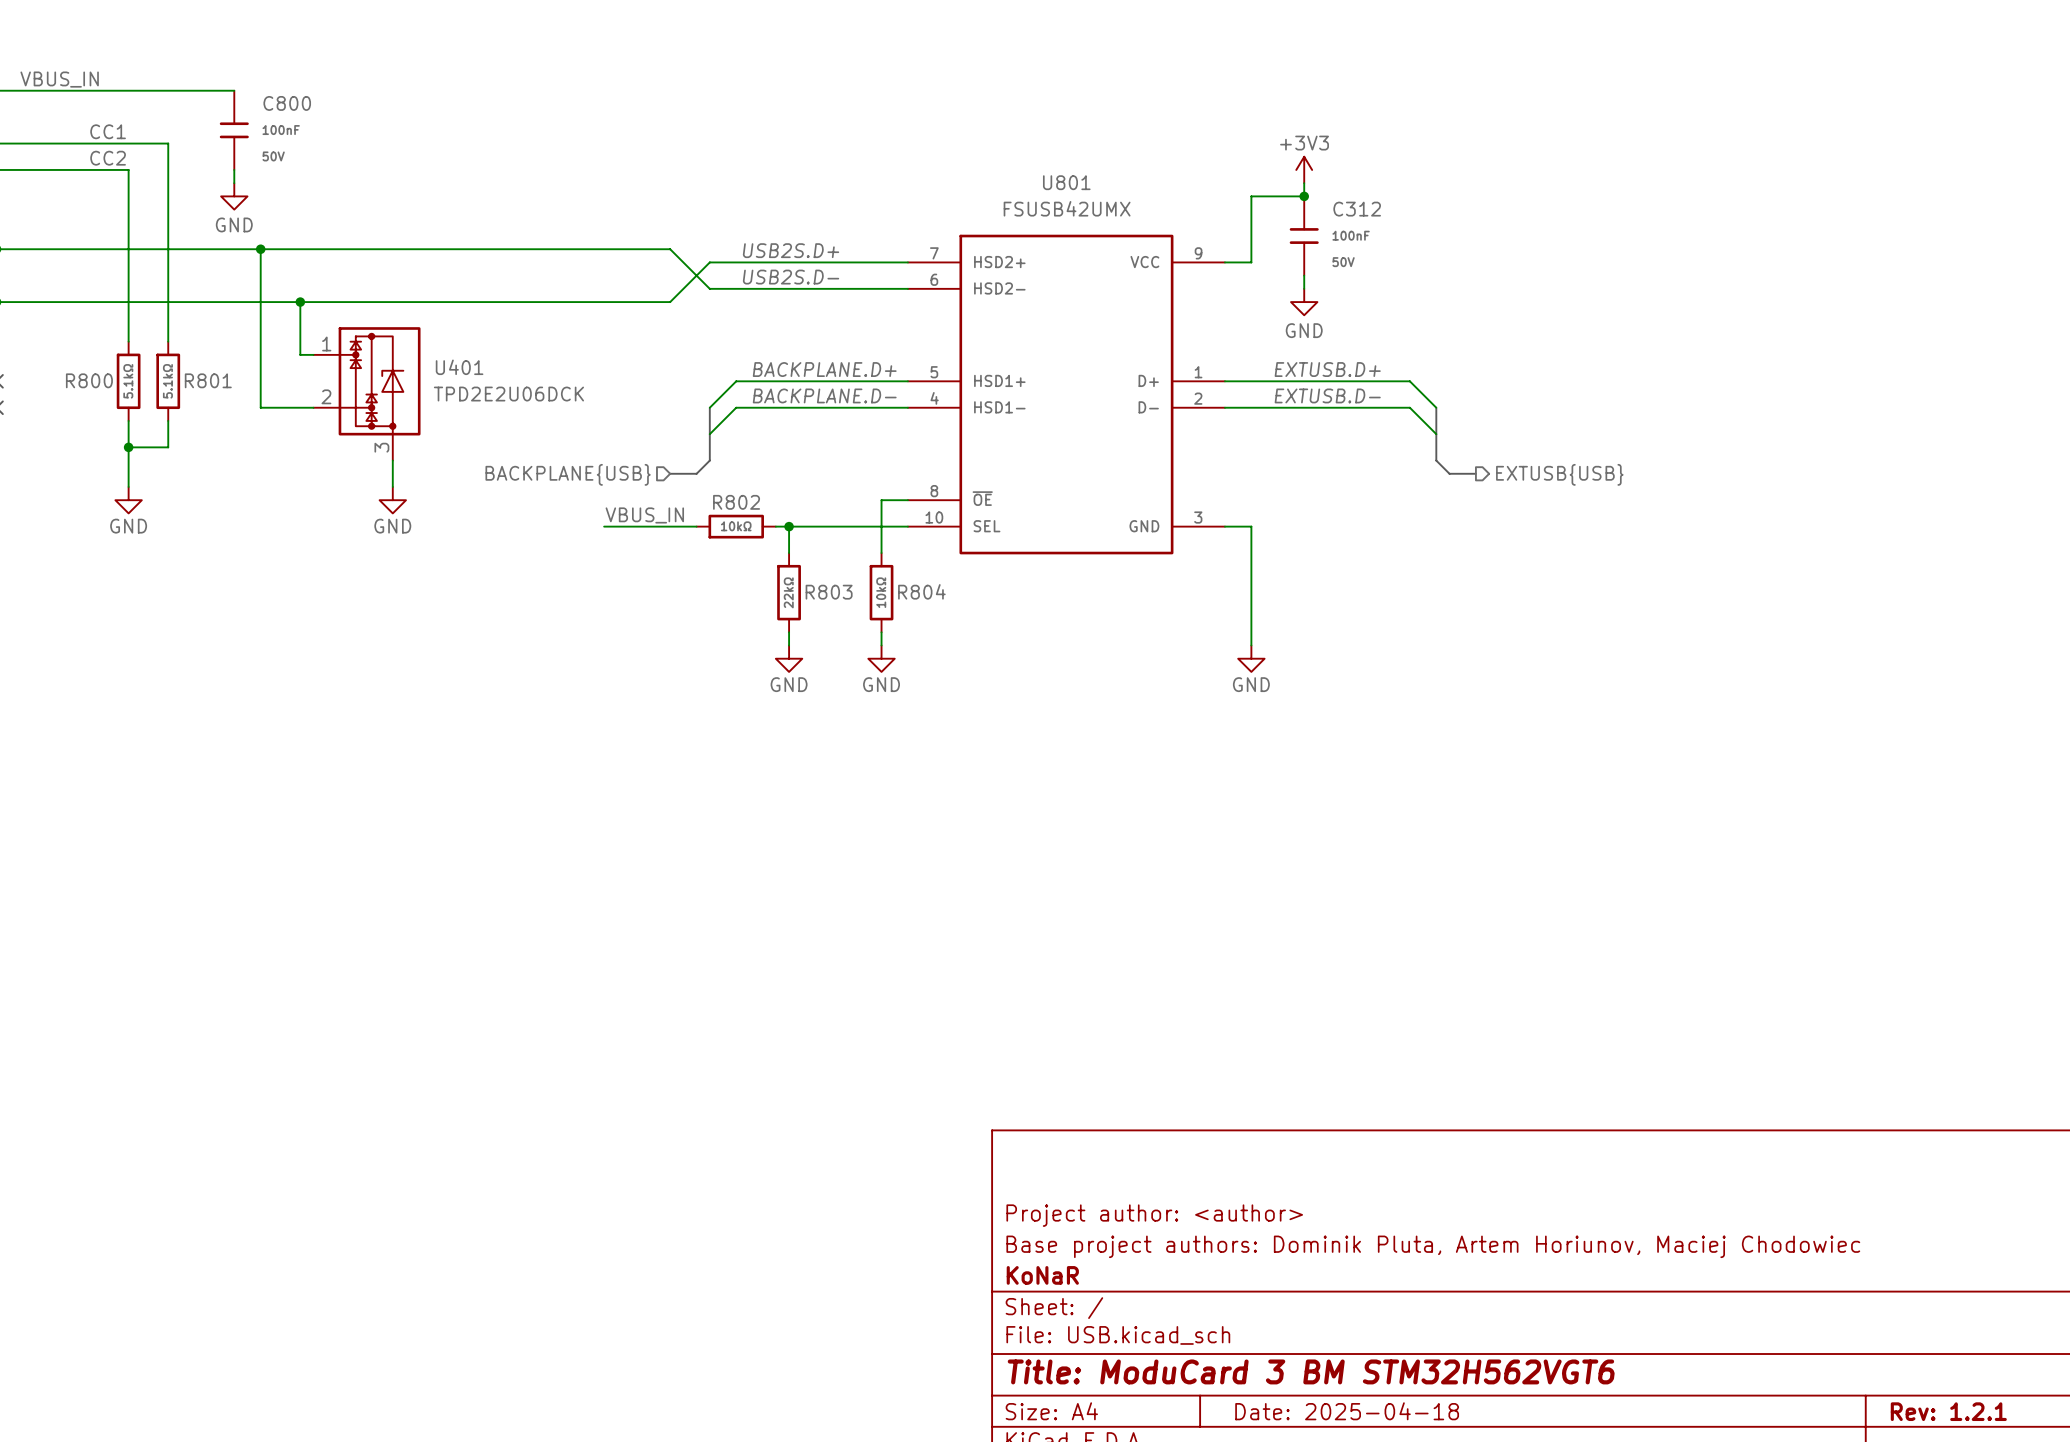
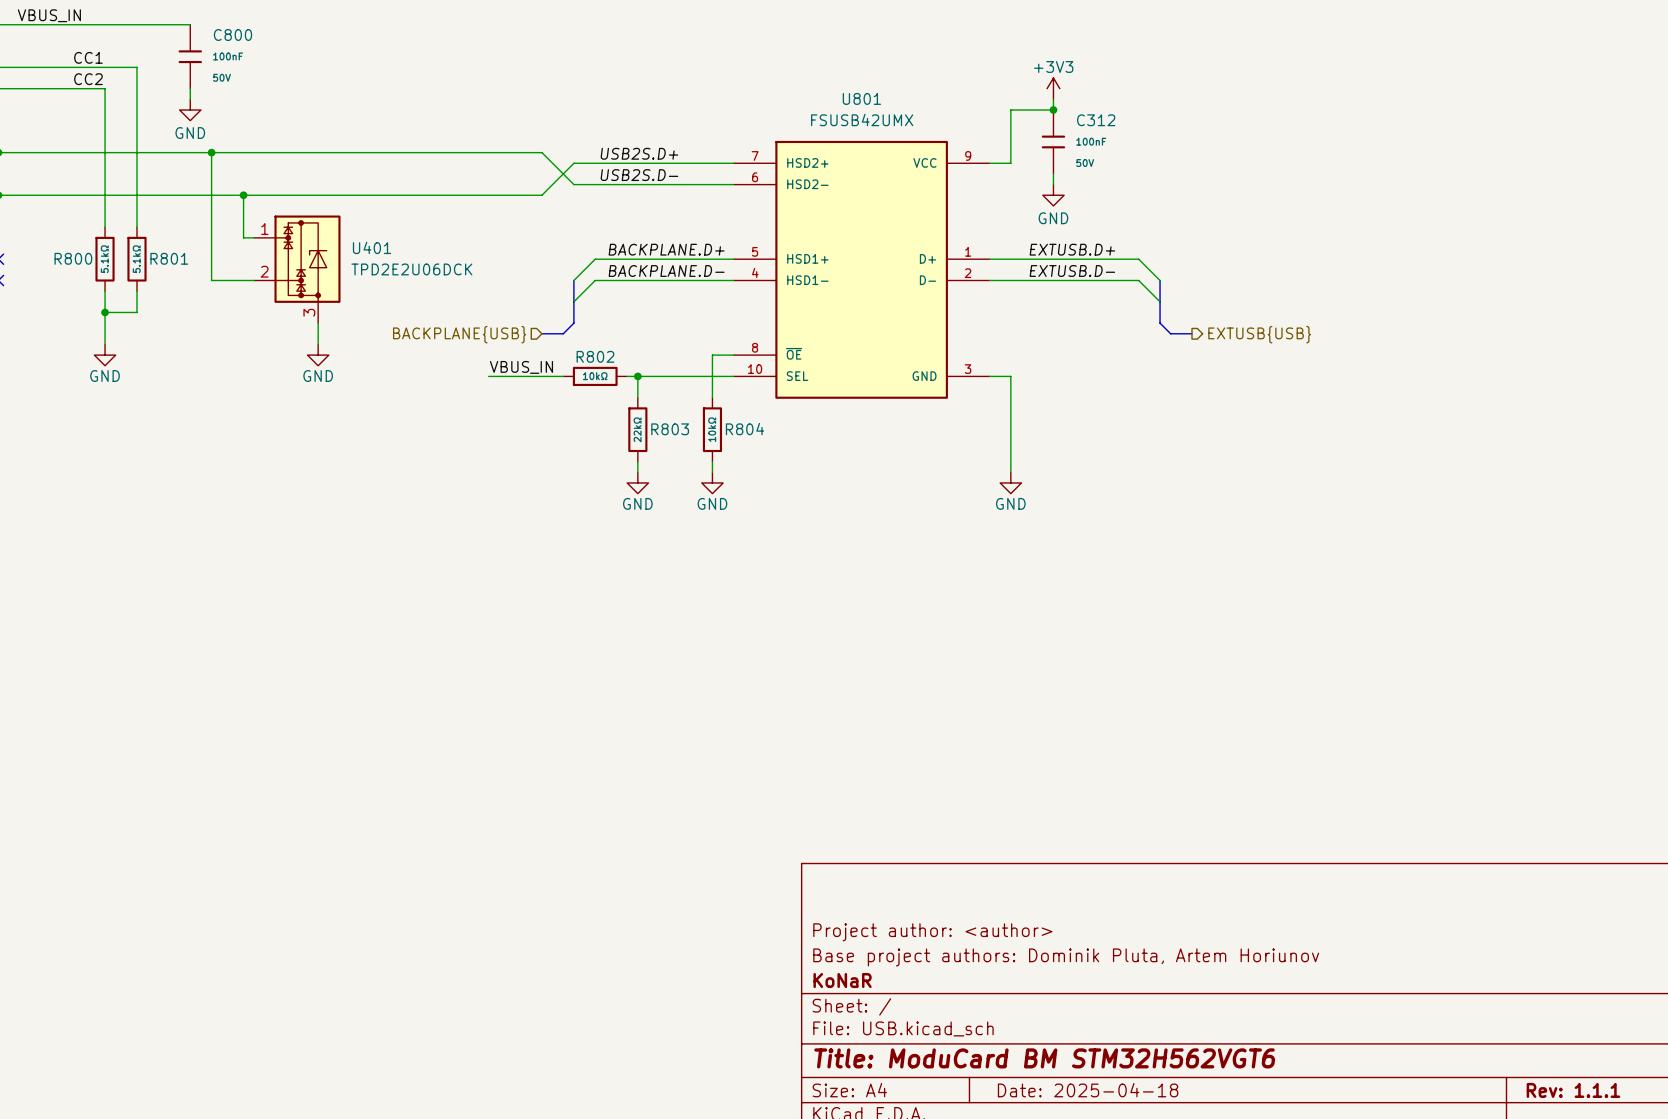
title block: Base project authors: Dominik Pluta, Artem Horiunov, Maciej Chodowiec (1433, 1246) -> Base project authors: Dominik Pluta, Artem Horiunov (1066, 957)
title block: Title: ModuCard 3 BM STM32H562VGT6 (1311, 1371) -> Title: ModuCard BM STM32H562VGT6 (1044, 1058)
title block: Rev: 1.2.1 (1948, 1411) -> Rev: 1.1.1 (1573, 1090)

